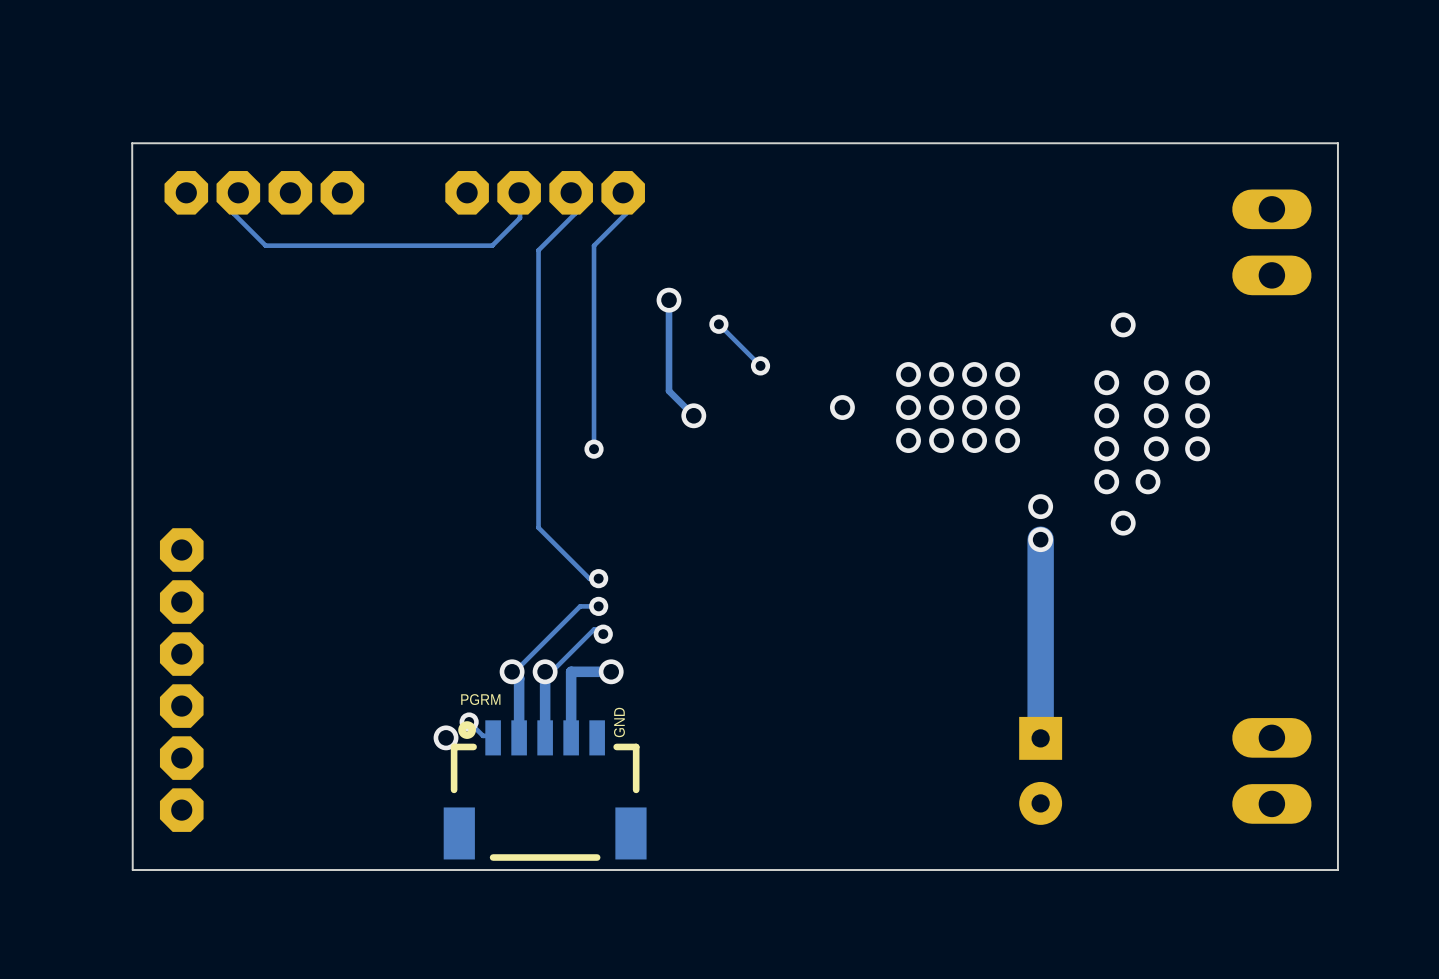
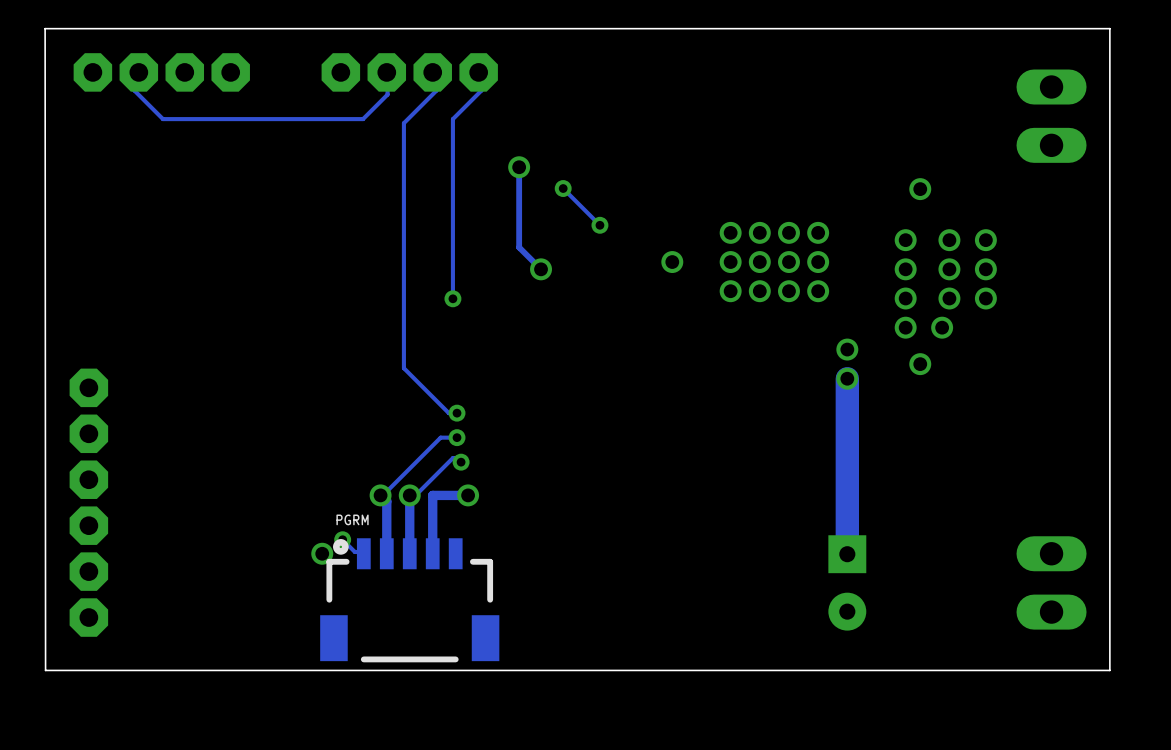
text: GND (619, 722) -> none

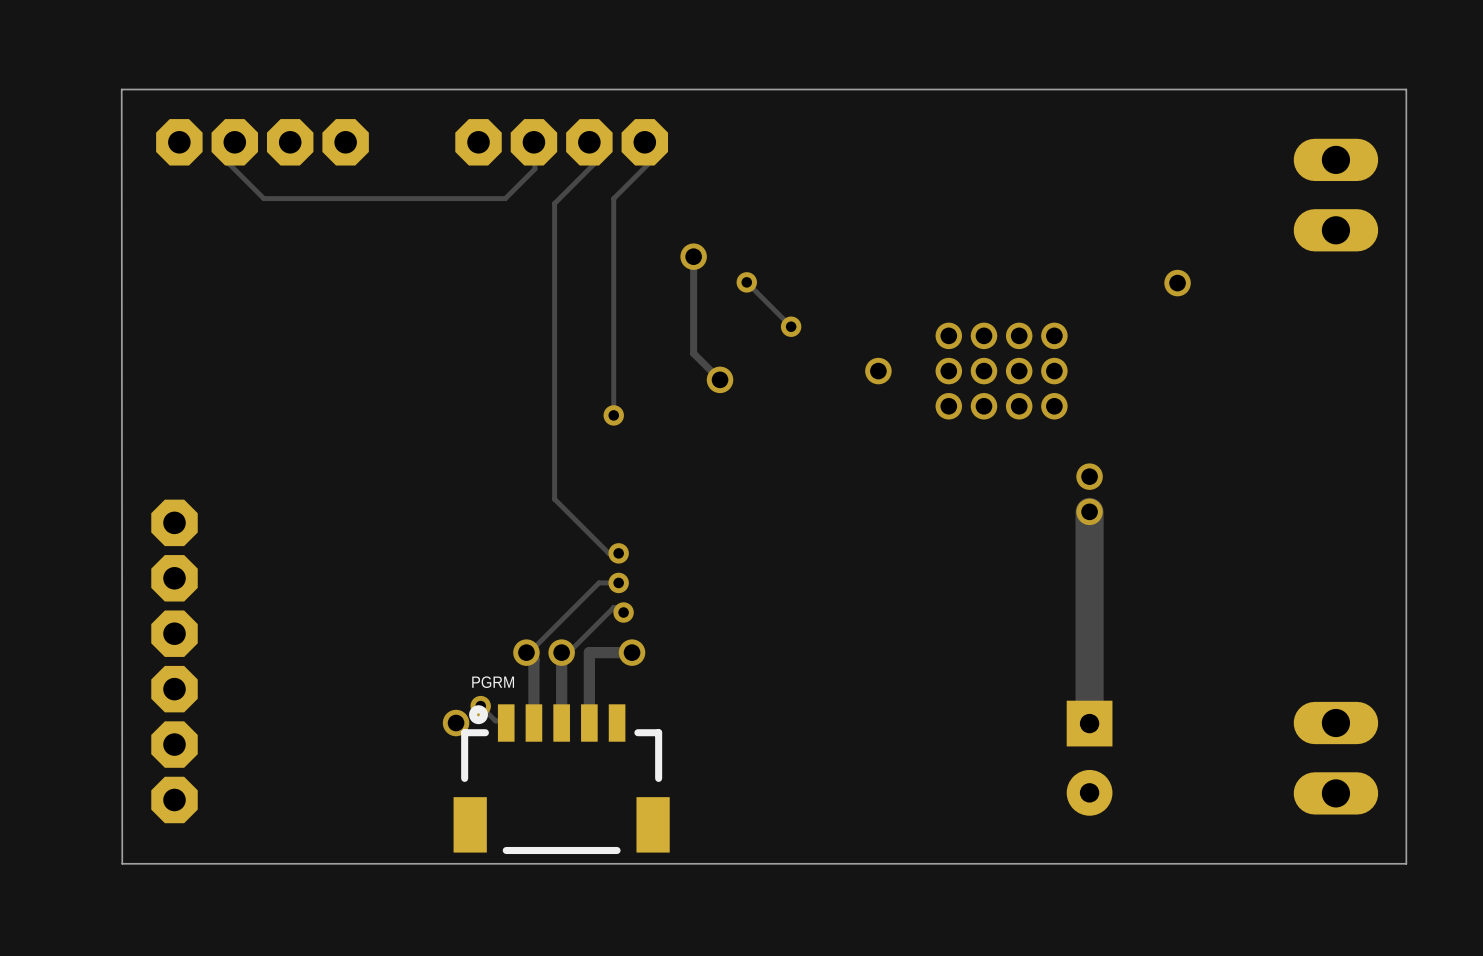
via: (905, 240) -> none
via: (949, 240) -> none
via: (985, 240) -> none
via: (905, 269) -> none
via: (949, 269) -> none
via: (985, 269) -> none
via: (905, 298) -> none
via: (949, 298) -> none
via: (985, 298) -> none
via: (905, 327) -> none
via: (942, 327) -> none
via: (920, 364) -> none

